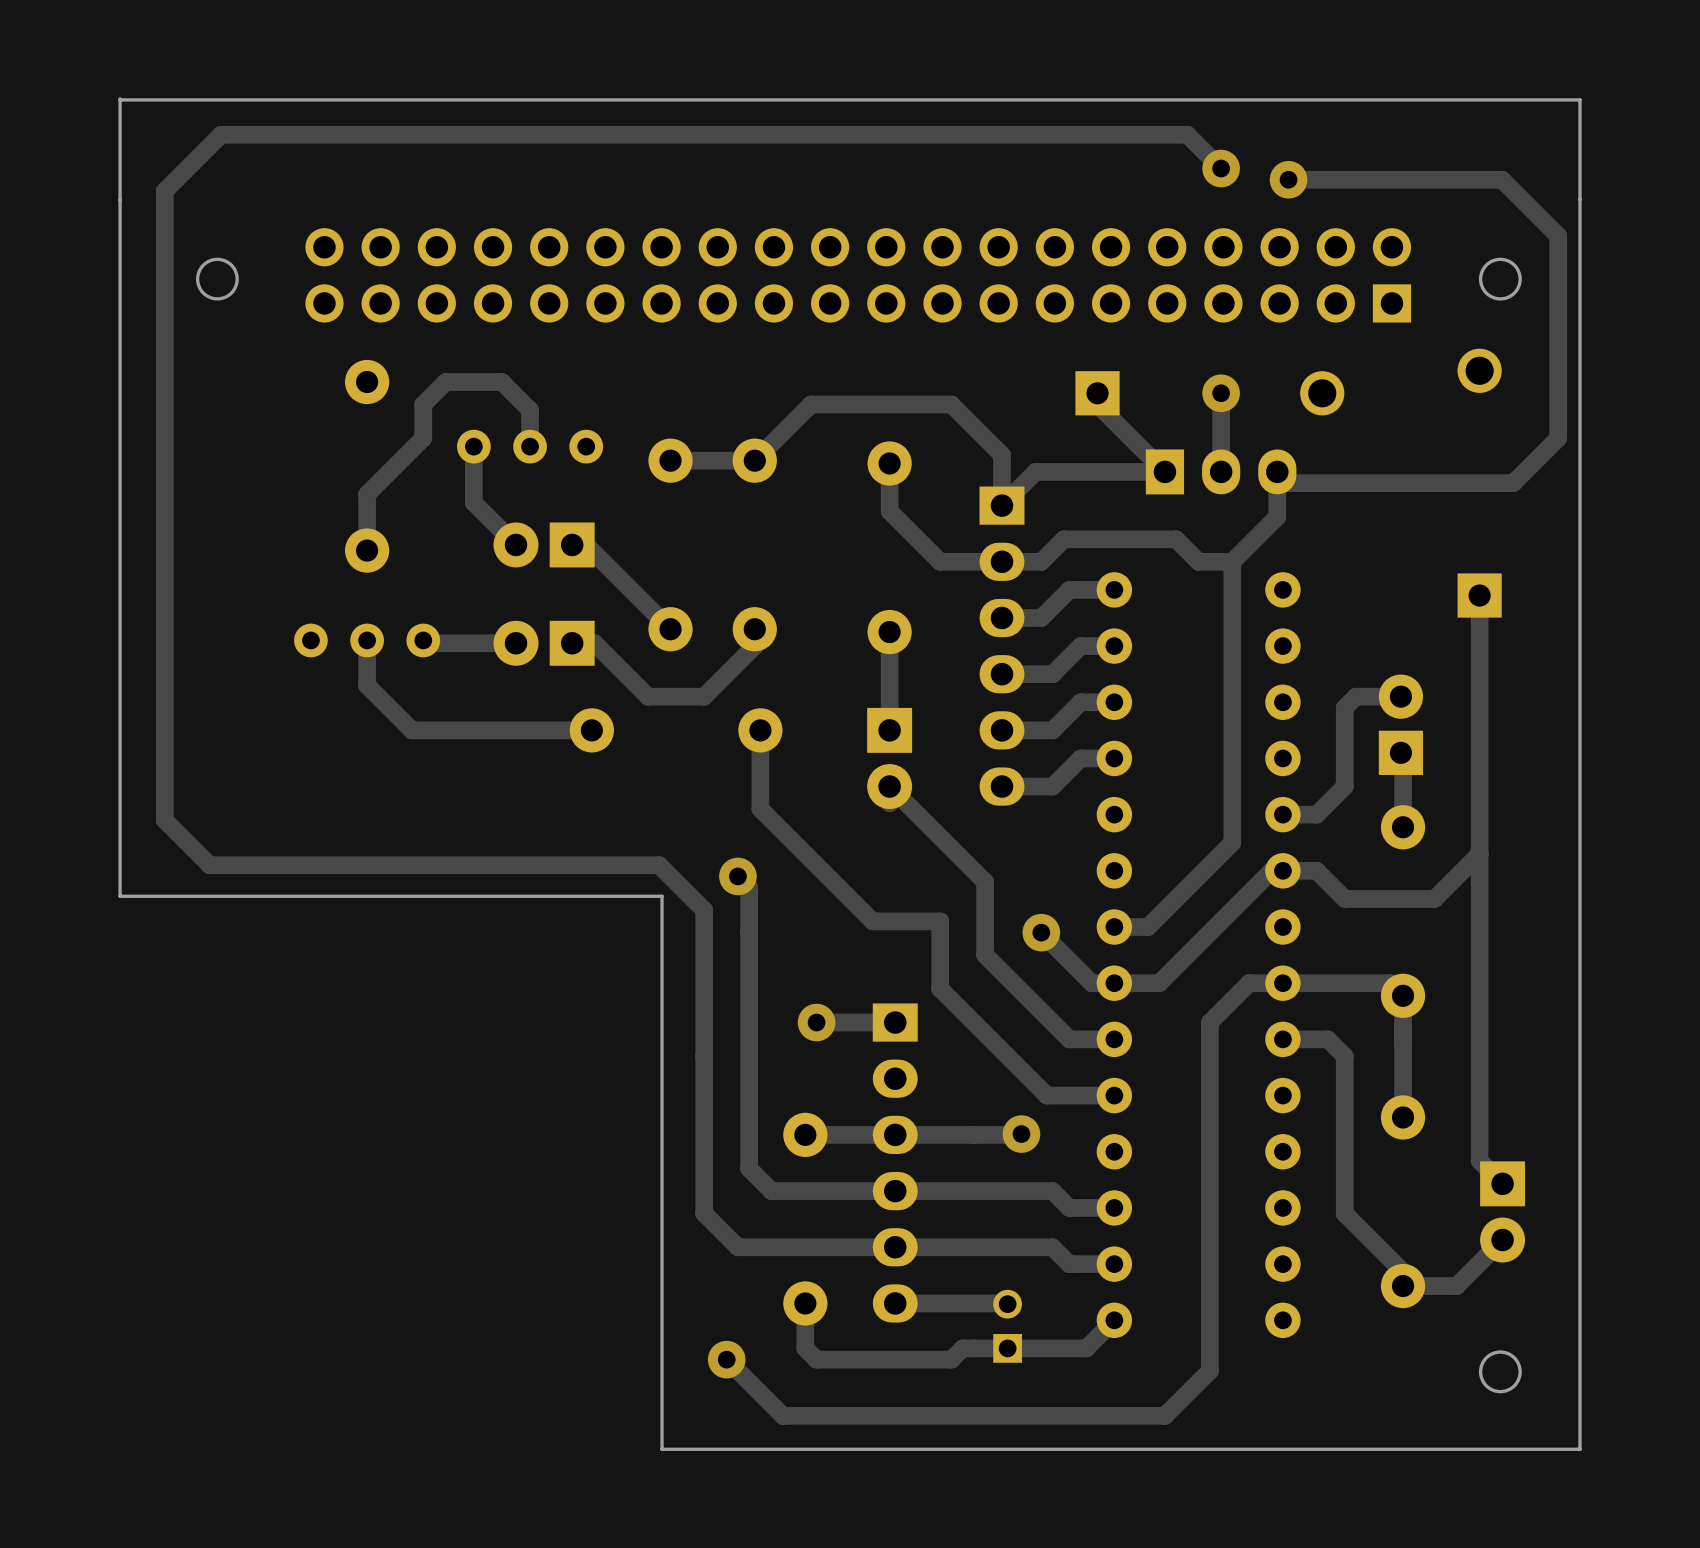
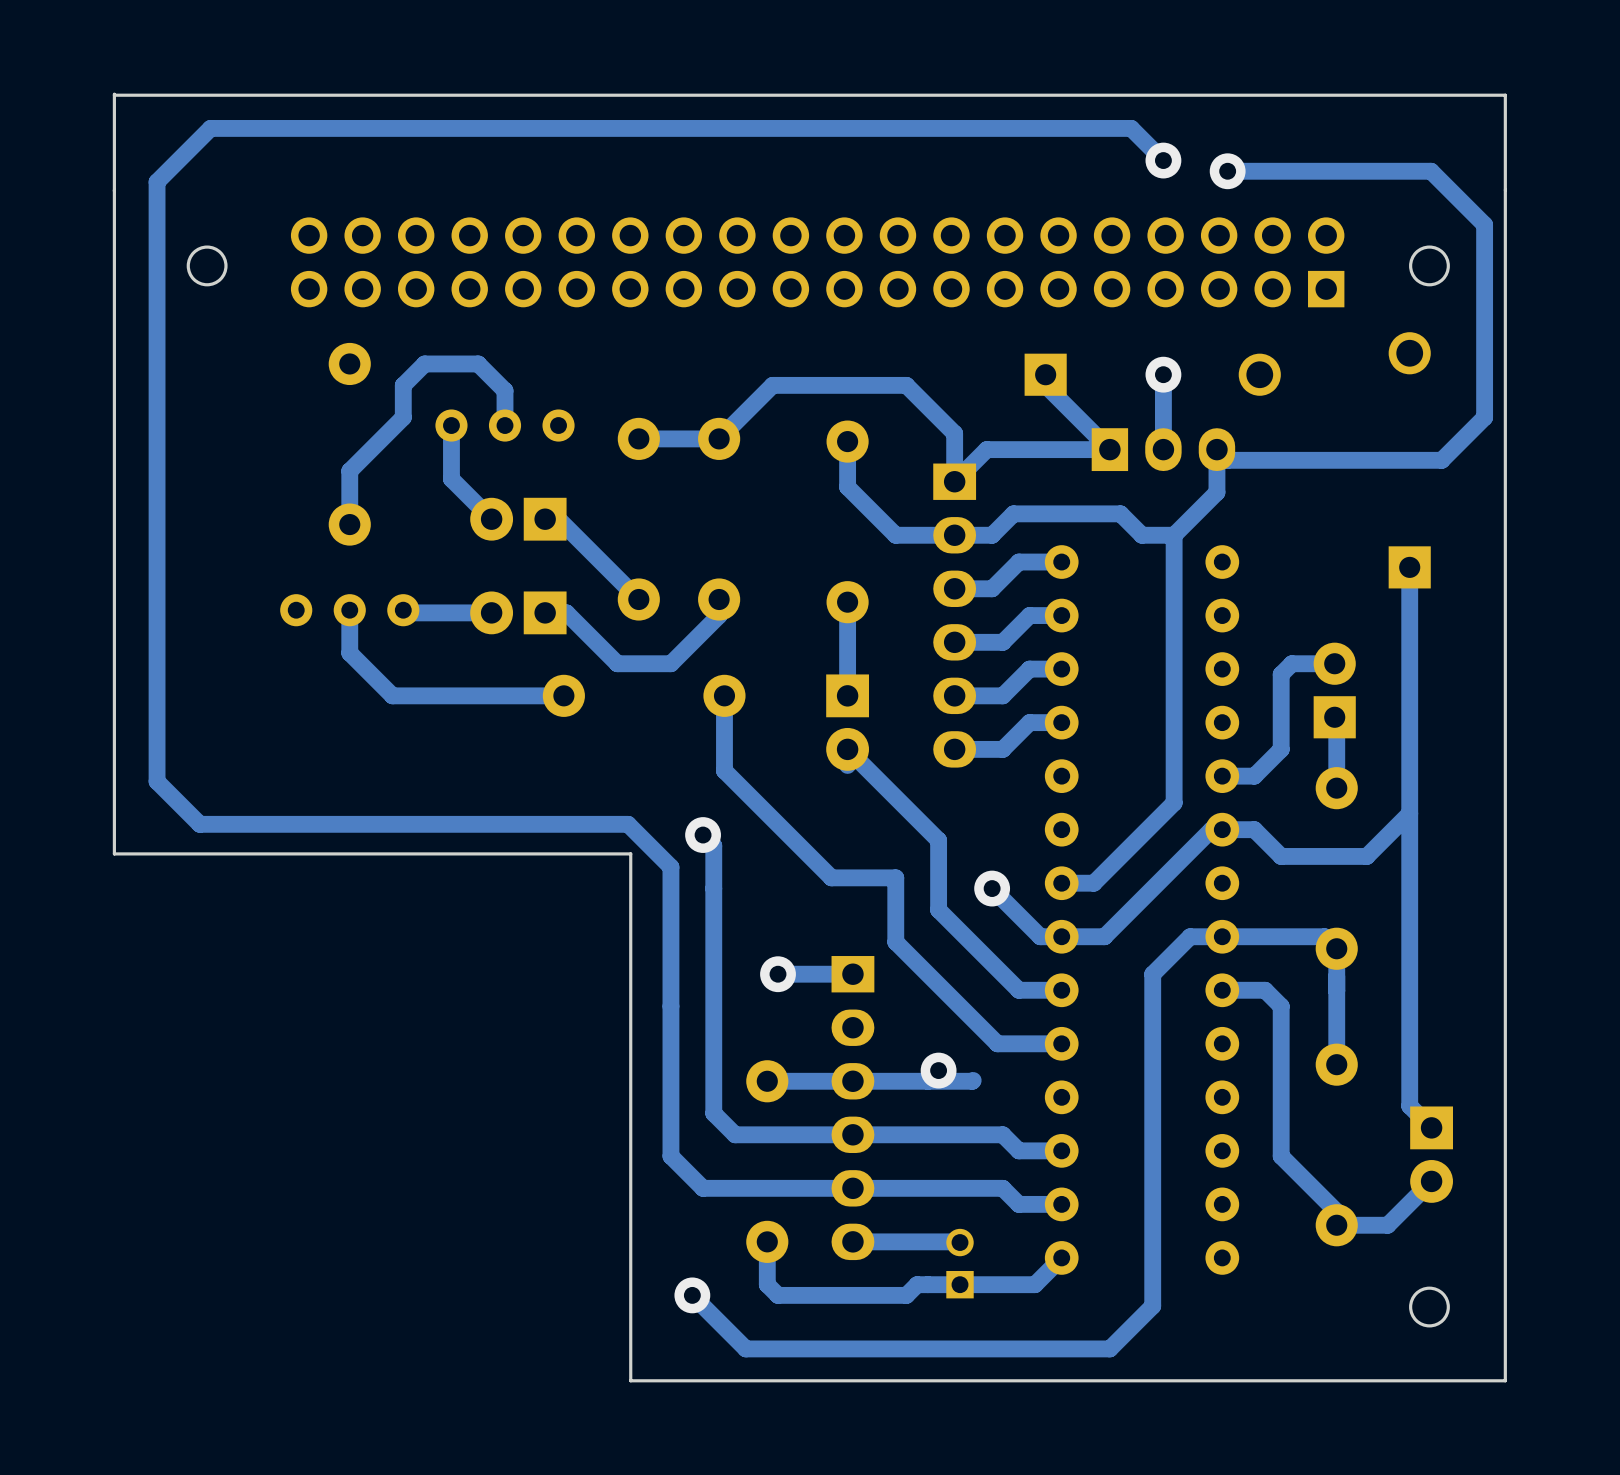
via position: (1021, 1134) -> (938, 1070)

